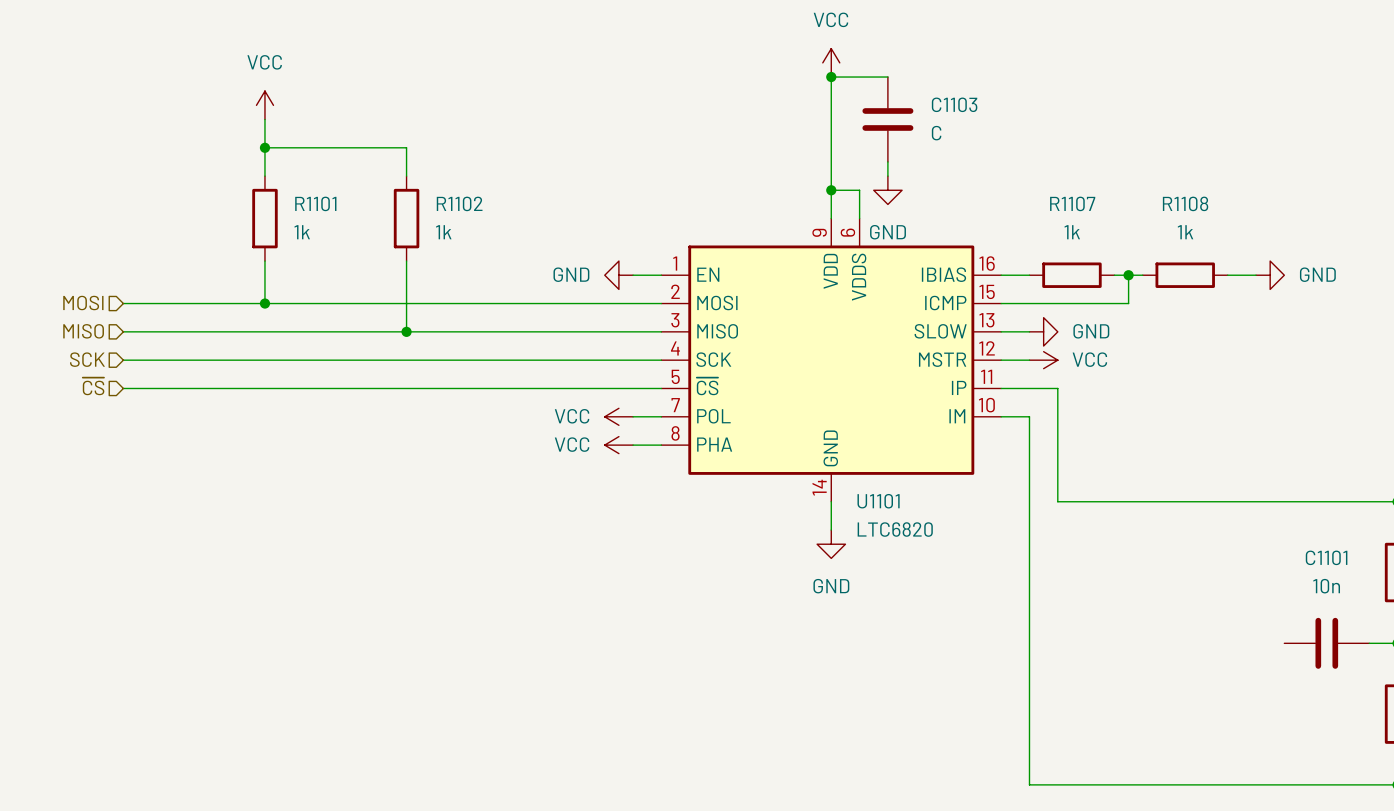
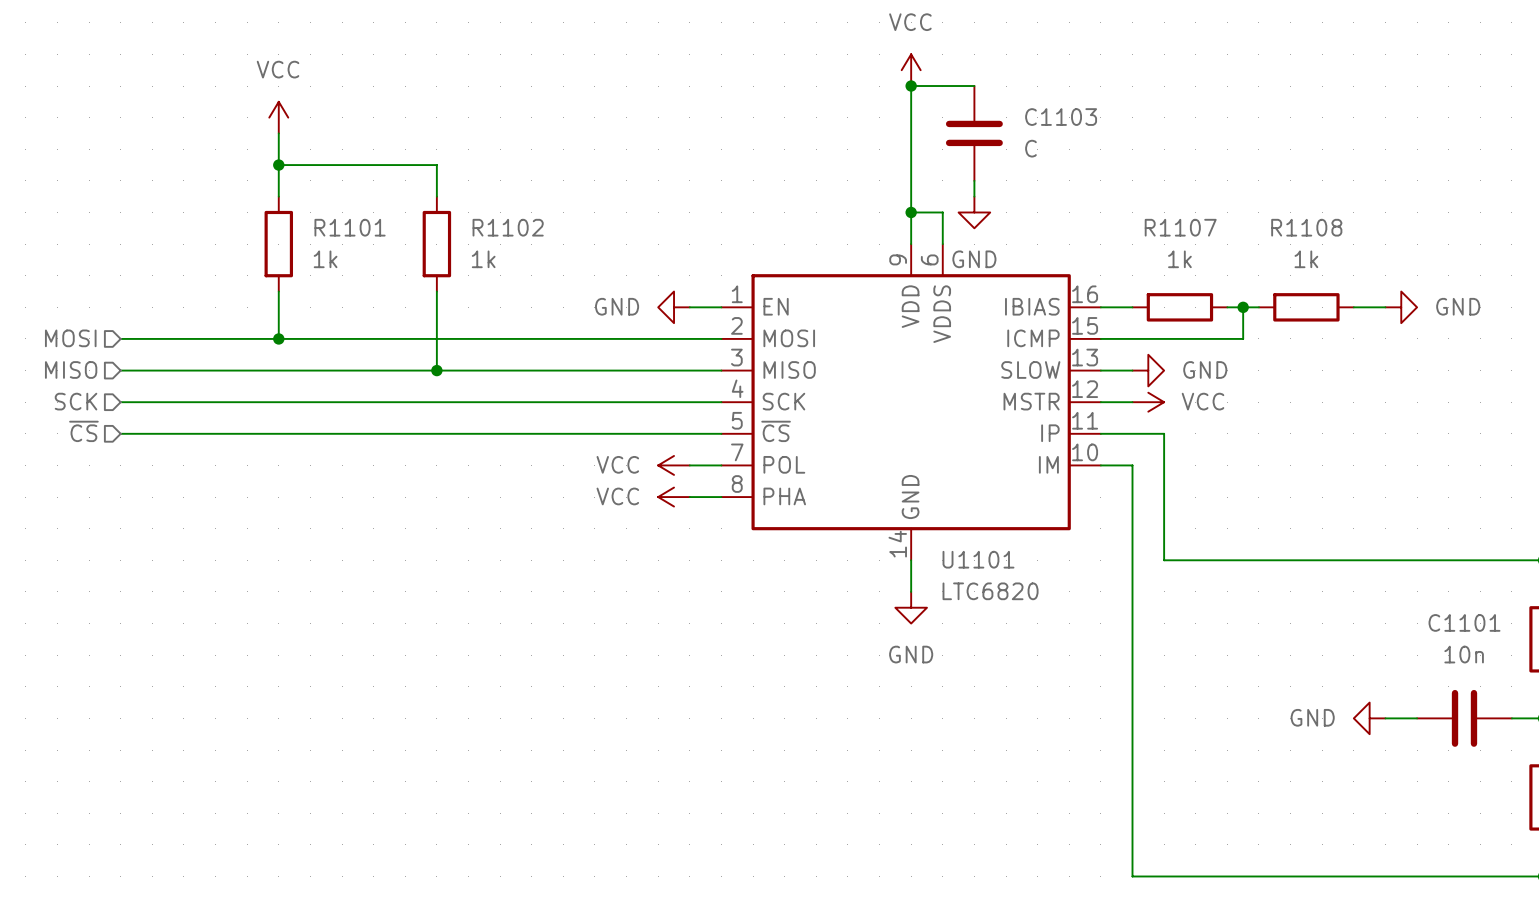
power symbol: none -> GND (1369, 718)
wire: none -> (1385, 718) (1417, 718)

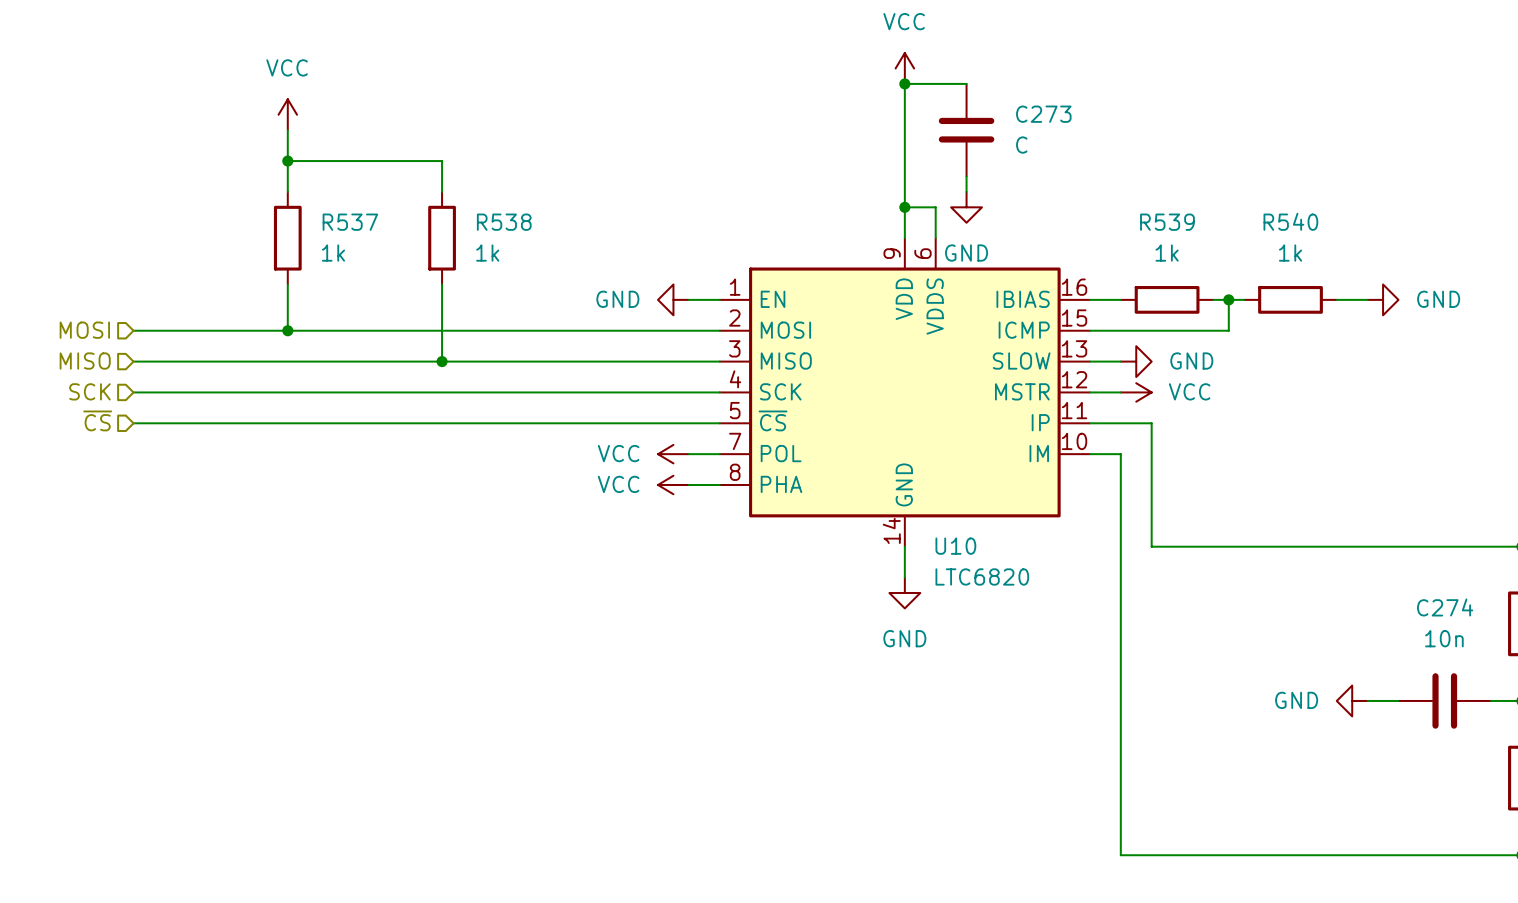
C1103 name: C1103 (1061, 117) -> C273 (1043, 114)
R1101 name: R1101 (350, 227) -> R537 (350, 222)
R1102 name: R1102 (508, 227) -> R538 (504, 222)
R1107 name: R1107 (1180, 227) -> R539 (1167, 222)
R1108 name: R1108 (1306, 227) -> R540 (1290, 221)
U1101 name: U1101 (978, 559) -> U10 (955, 546)
C1101 name: C1101 (1464, 622) -> C274 (1445, 607)

